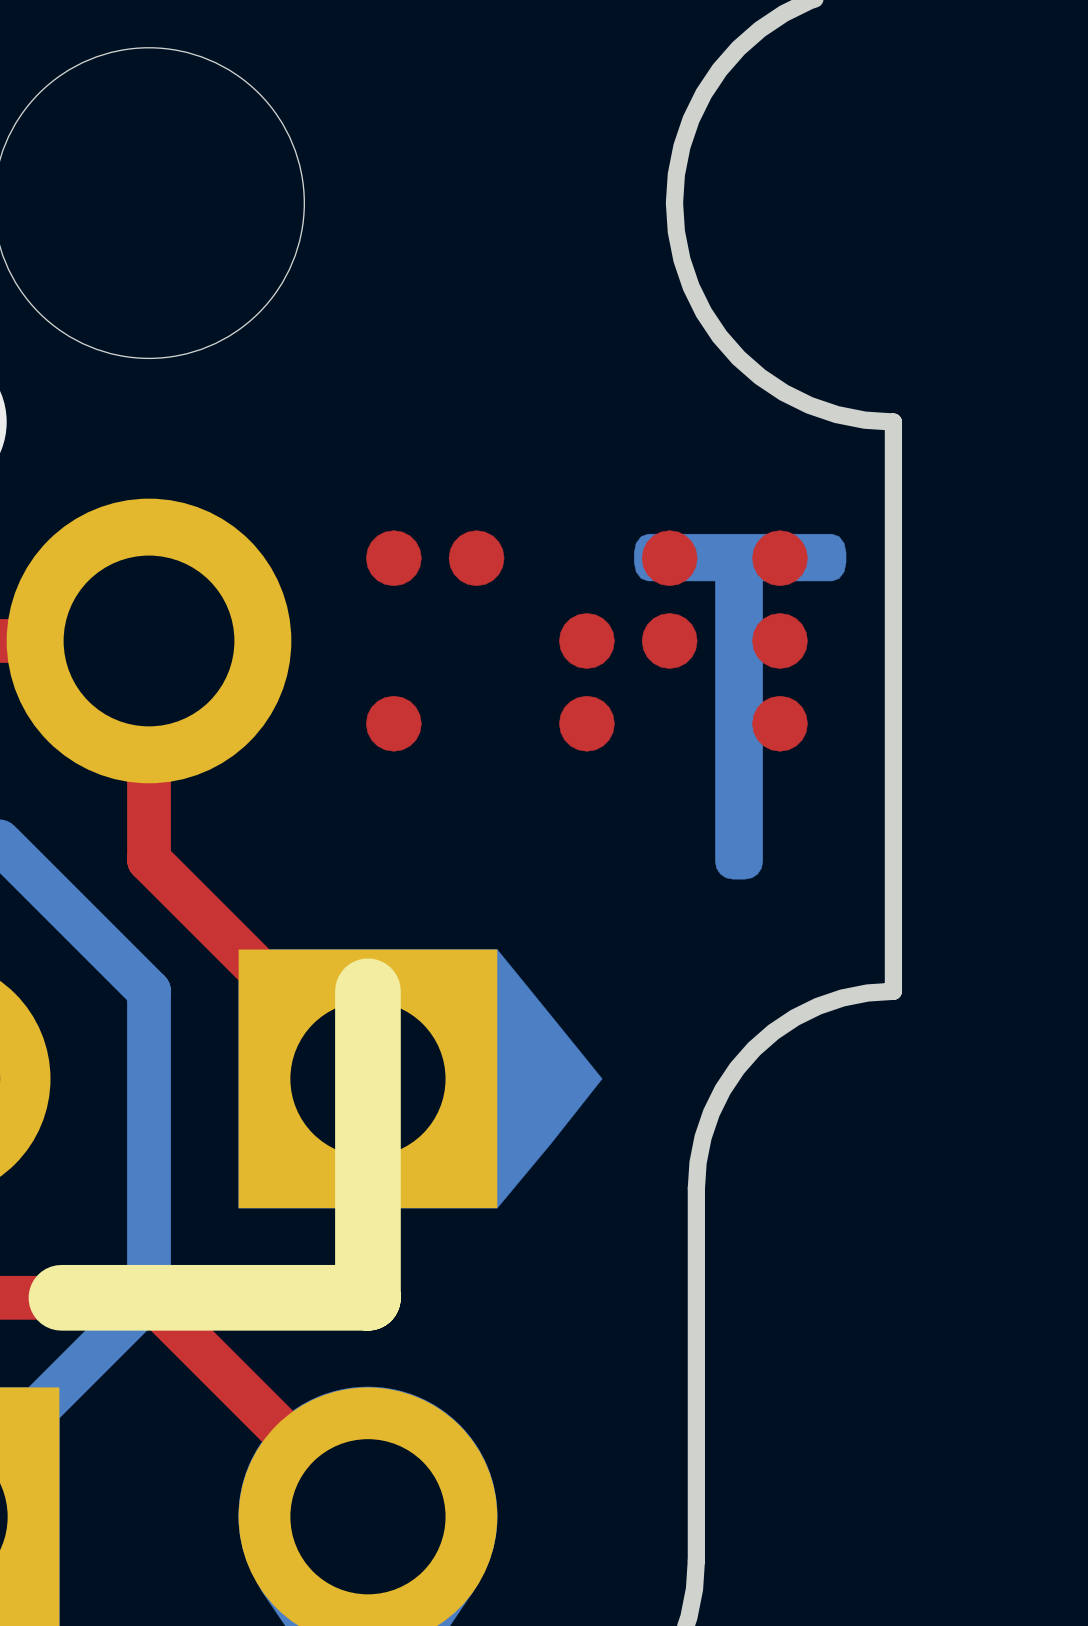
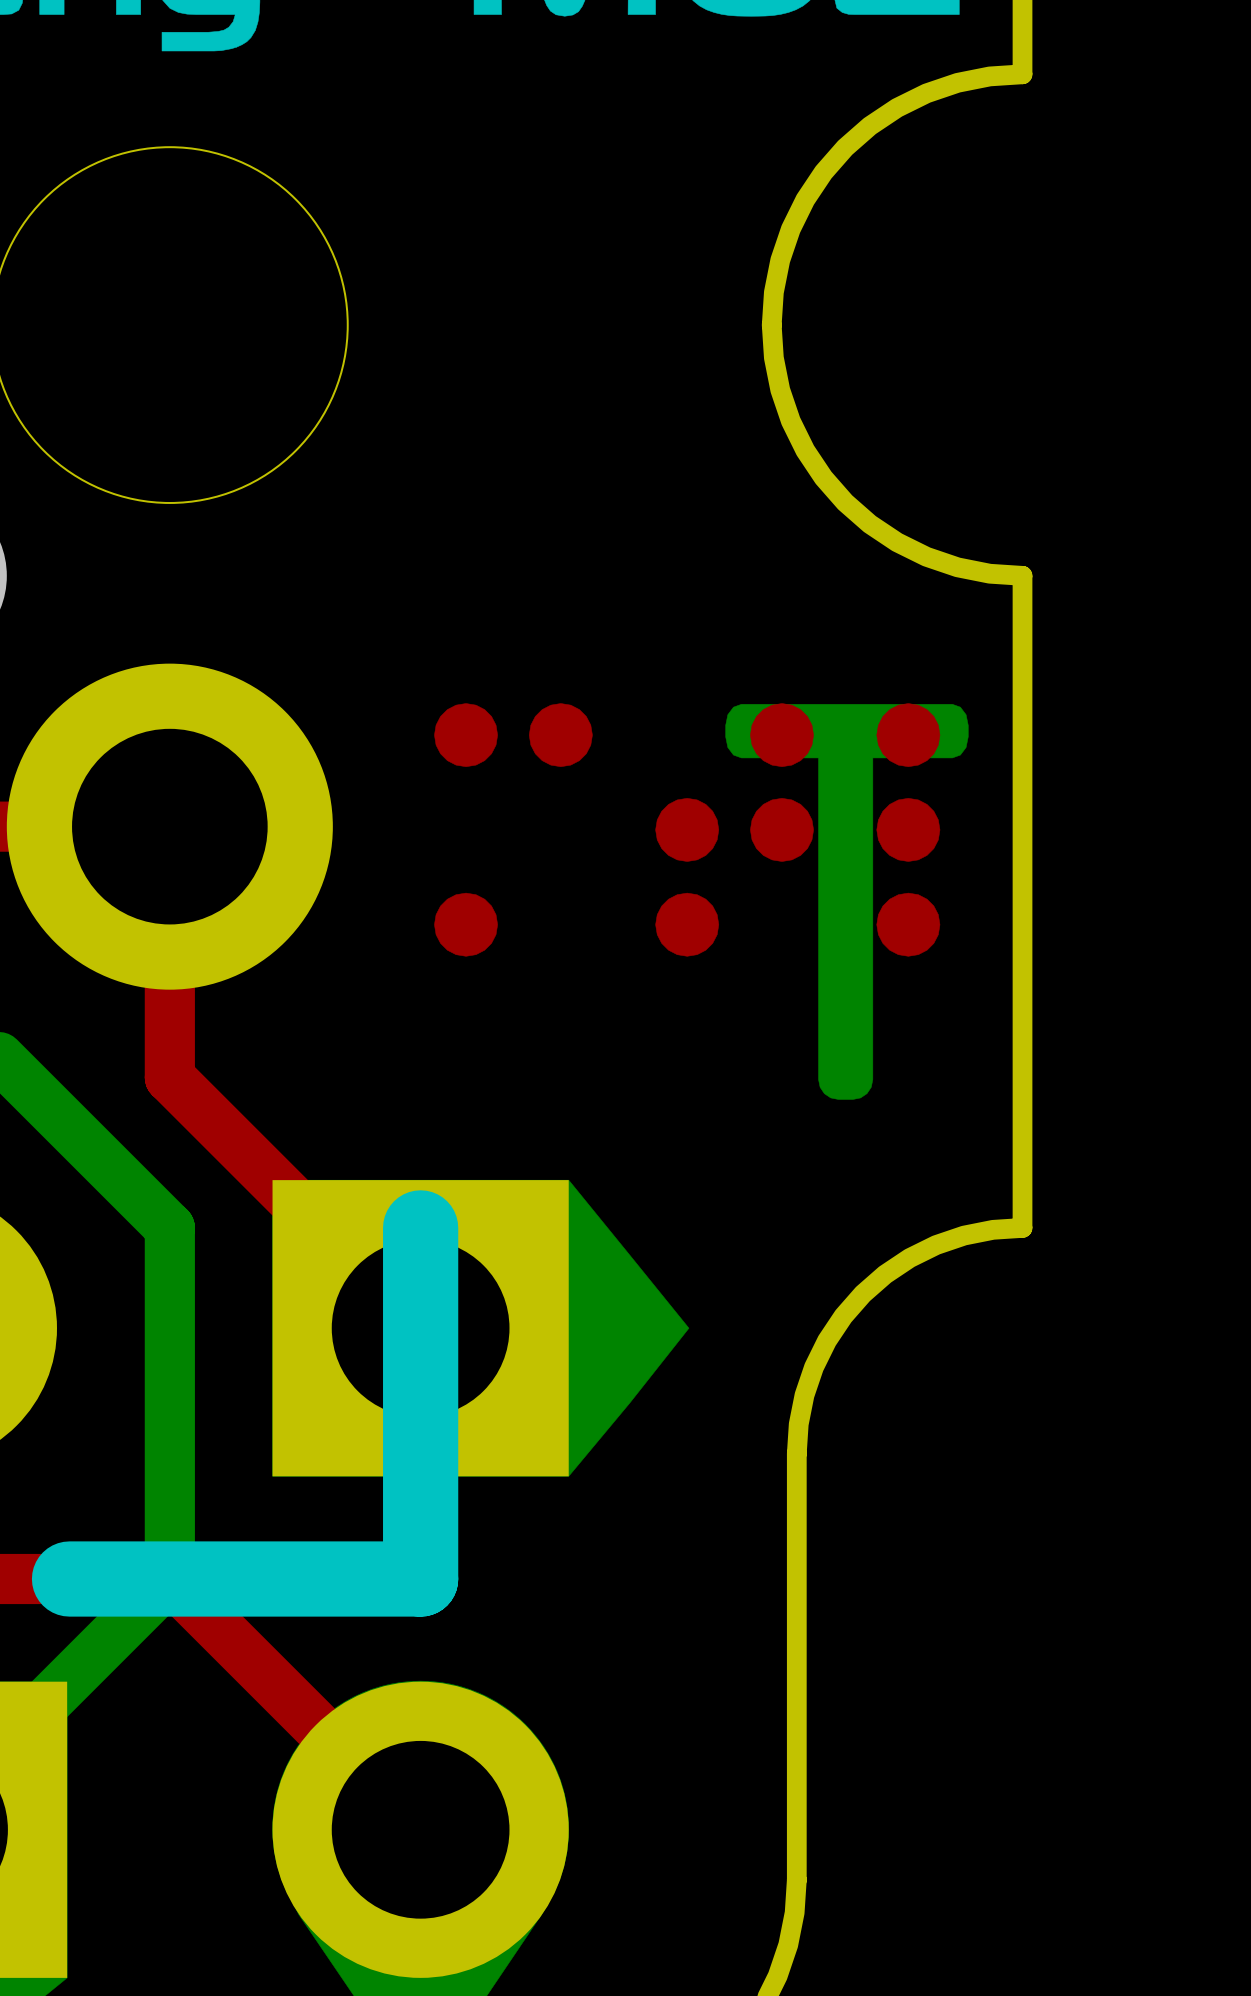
drawing position: (586, 640) -> (687, 829)

